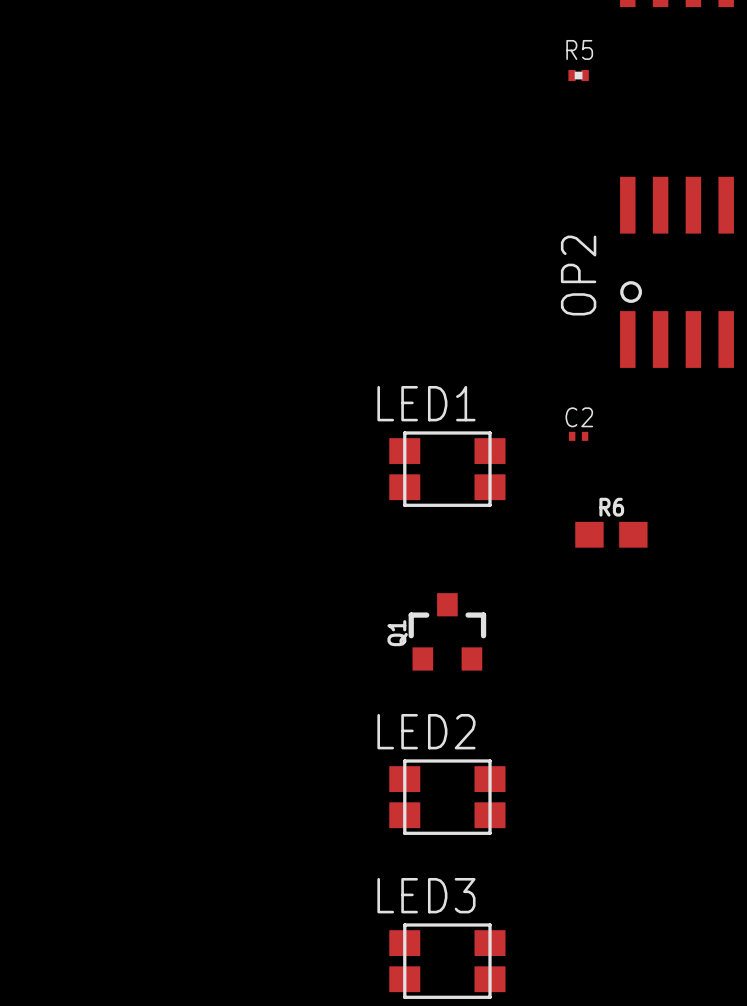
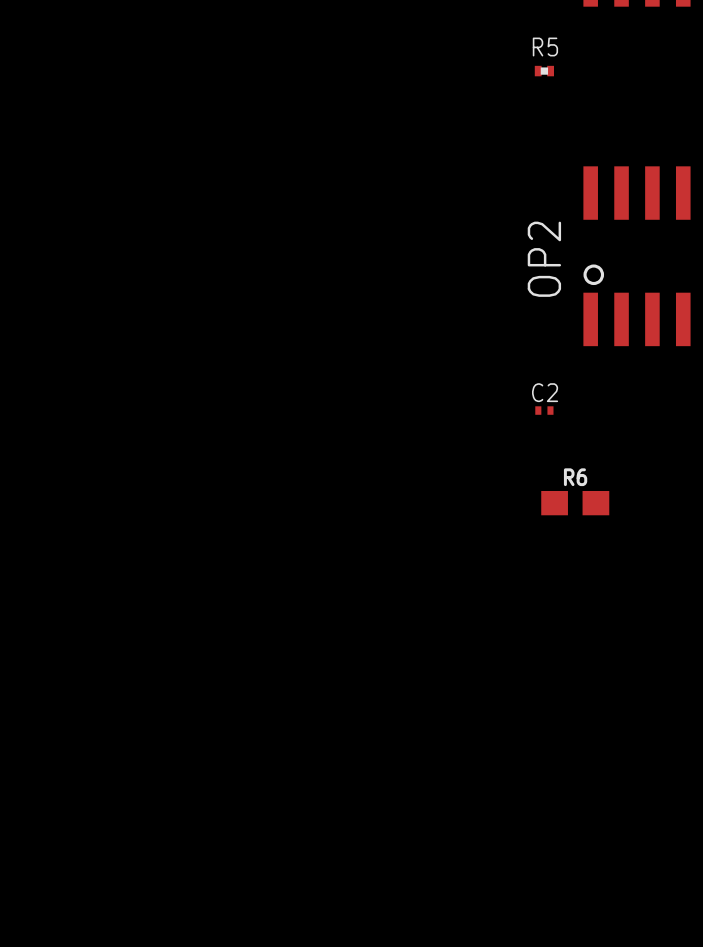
LED1: (447, 469) -> none
Q1: (447, 631) -> none
LED2: (447, 797) -> none
LED3: (447, 961) -> none

